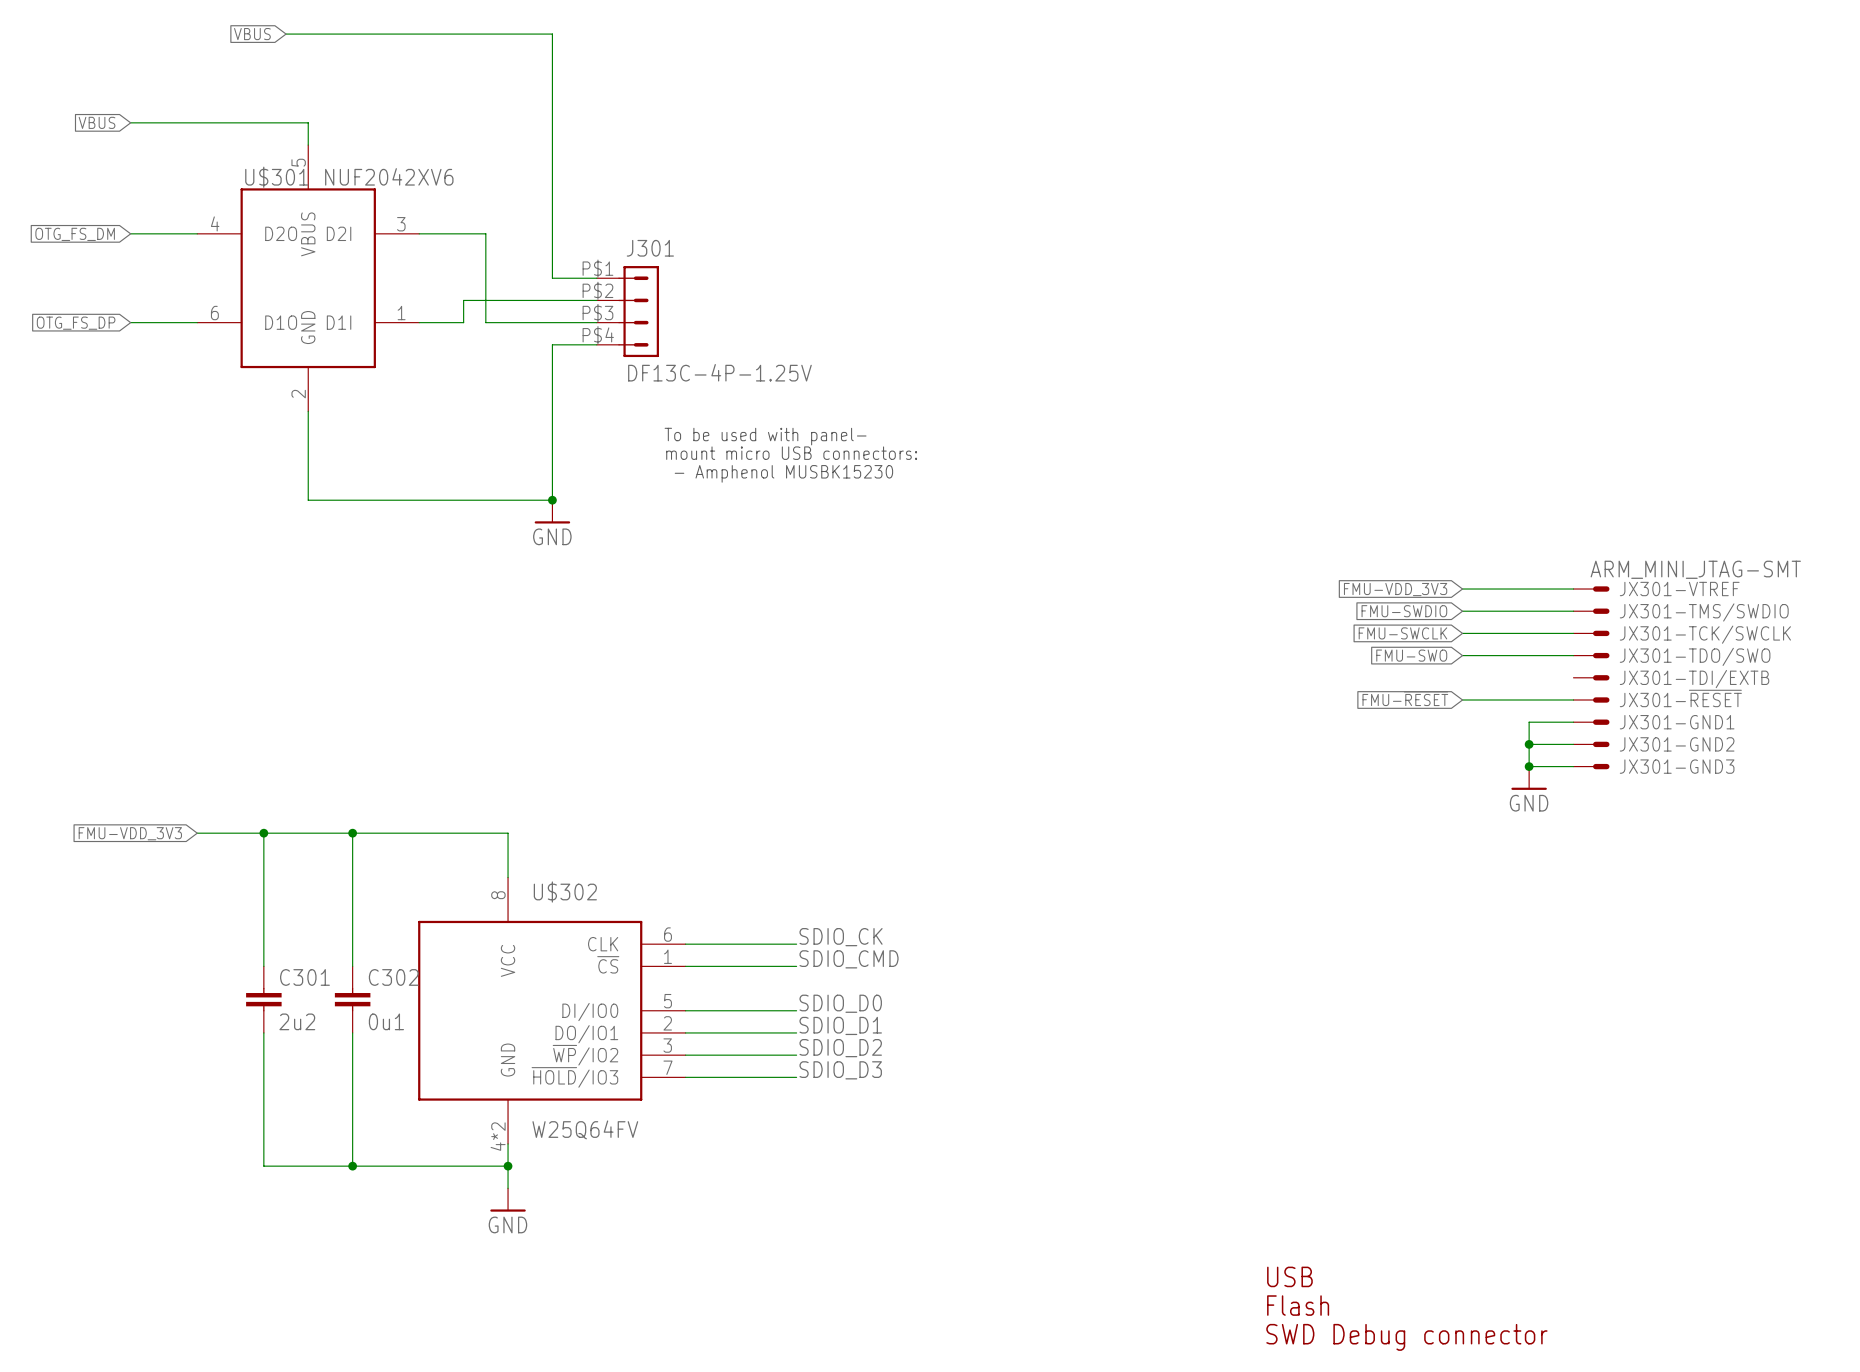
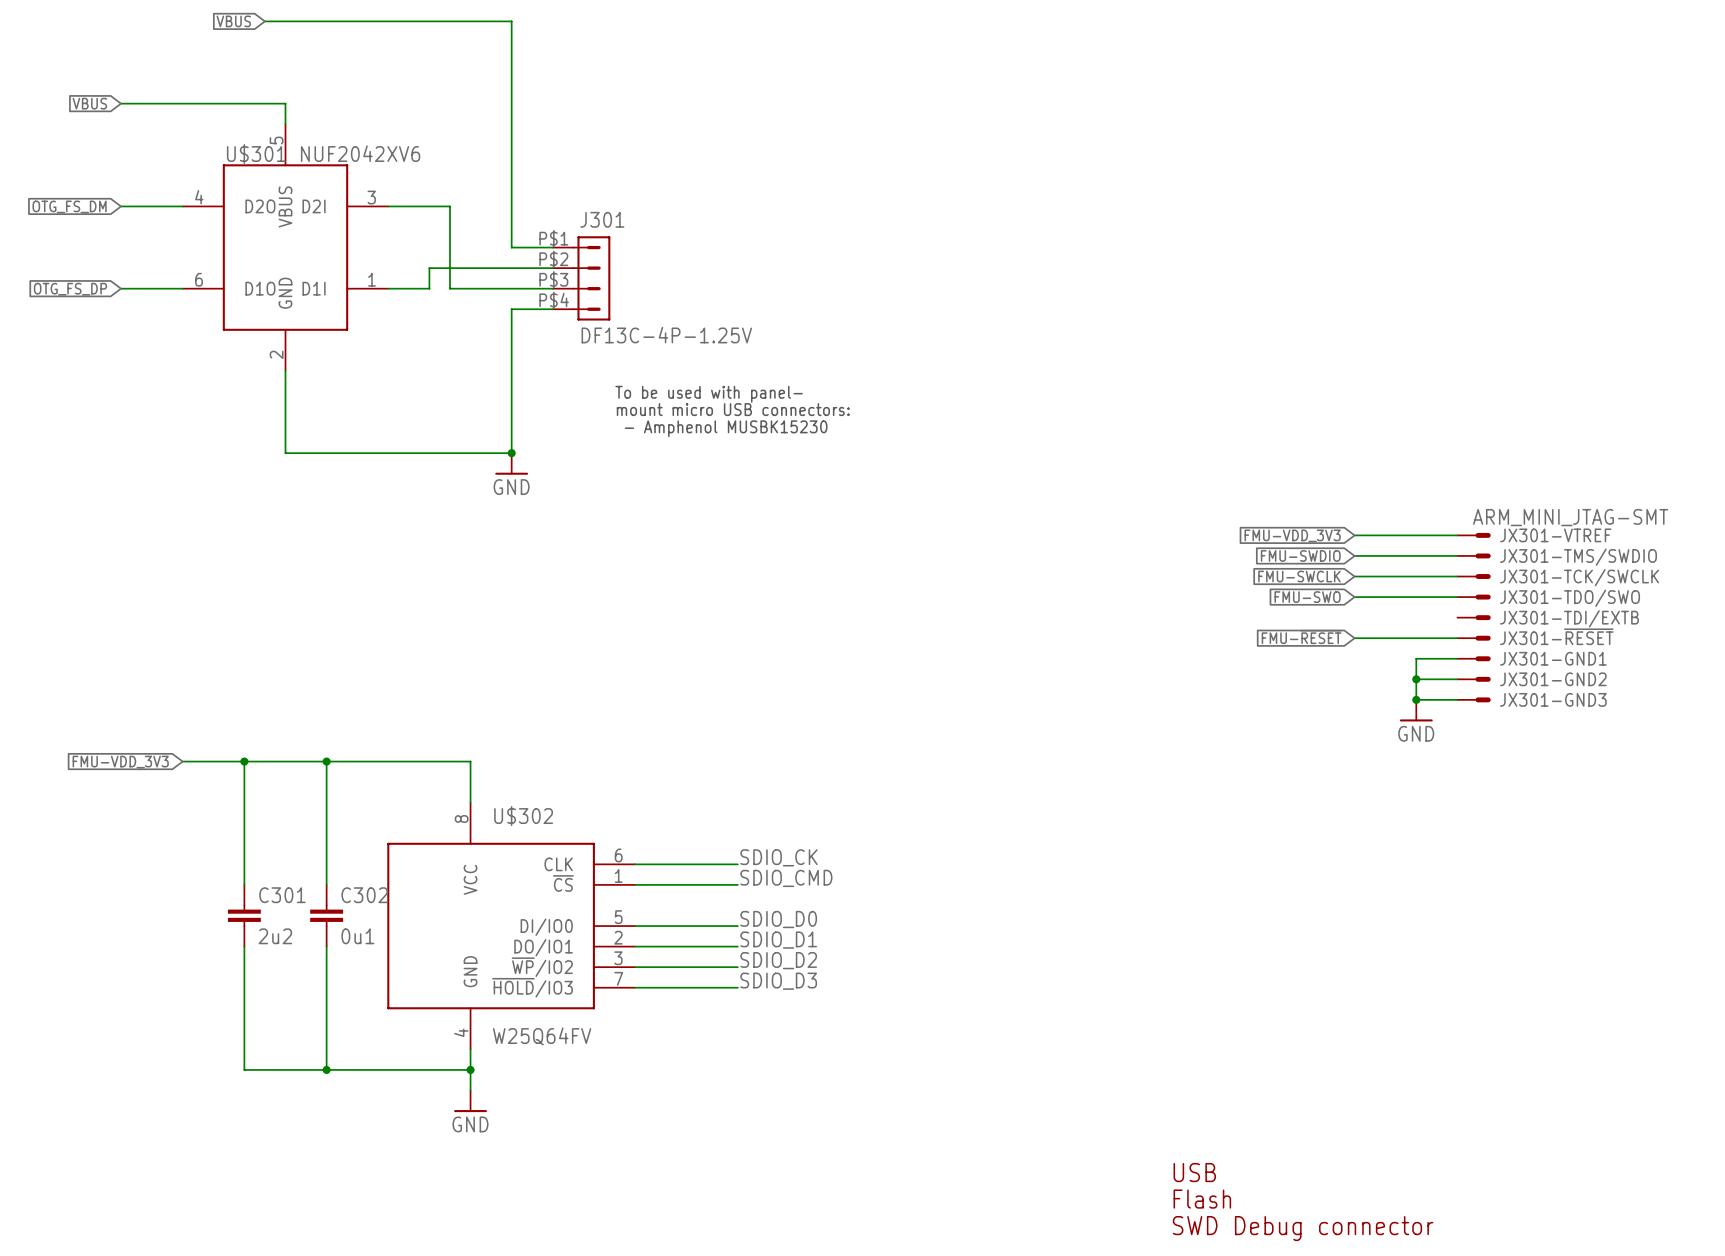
U$302 pin number: 4*2 (498, 1136) -> 4 (461, 1032)

